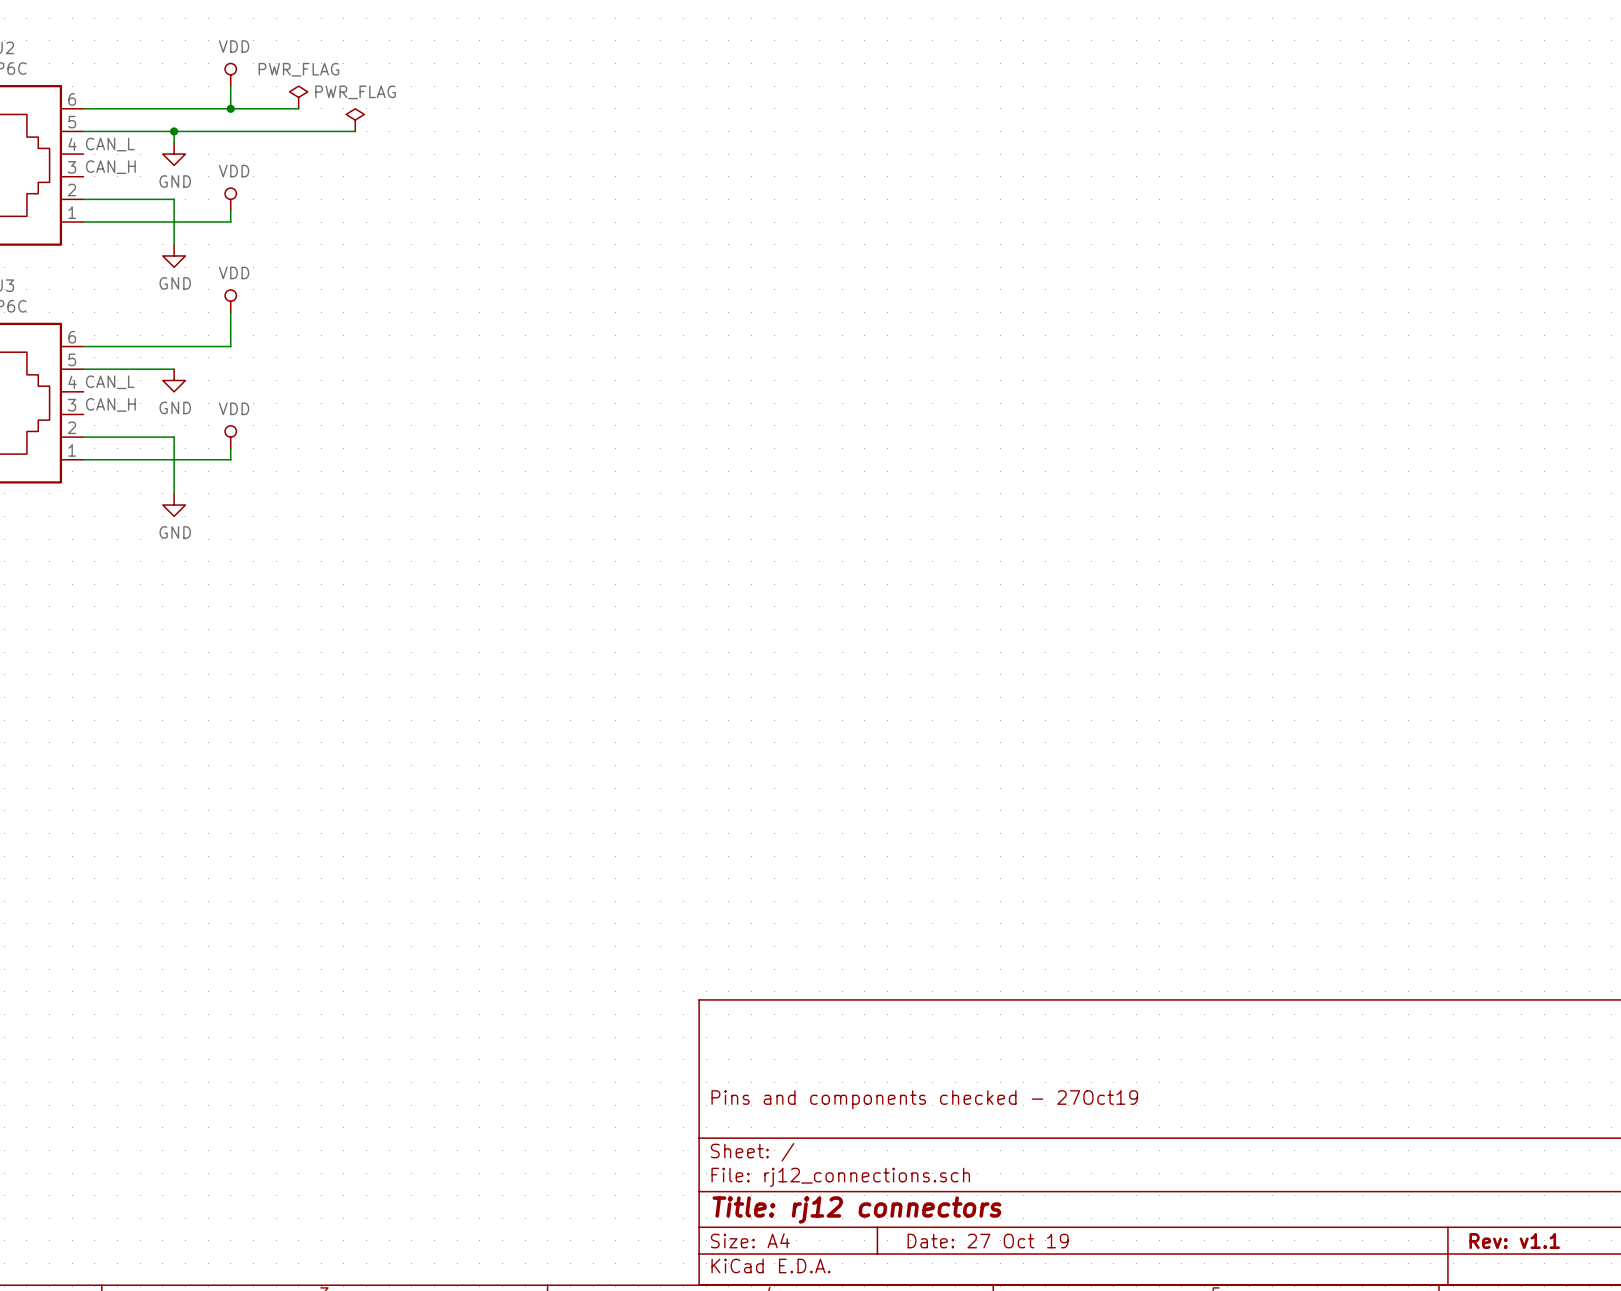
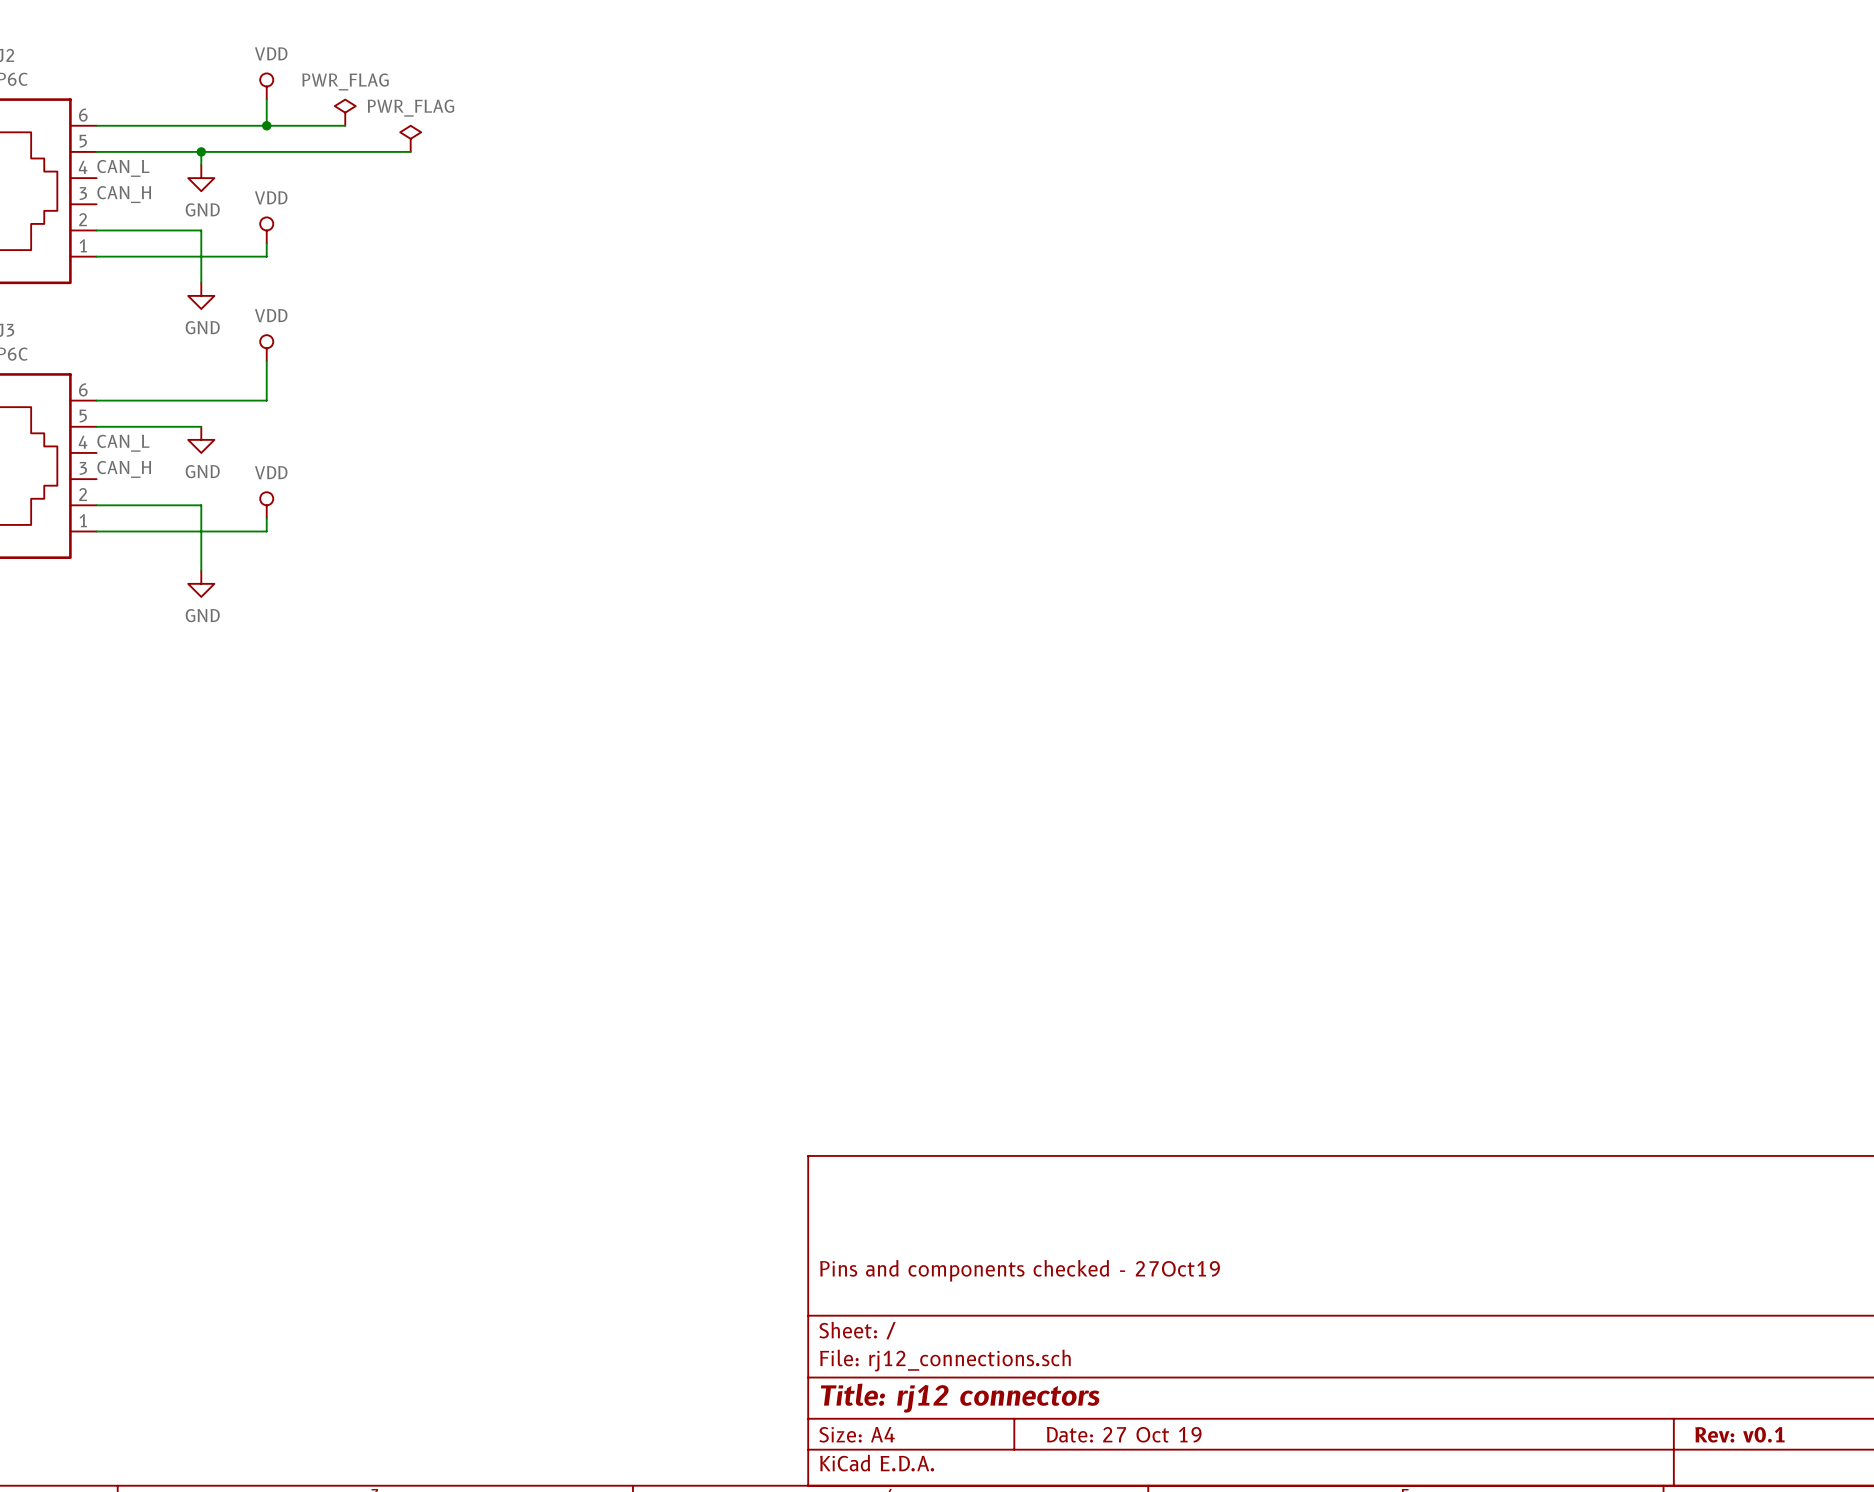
title block: Rev: v1.1 (1514, 1241) -> Rev: v0.1 (1739, 1434)

